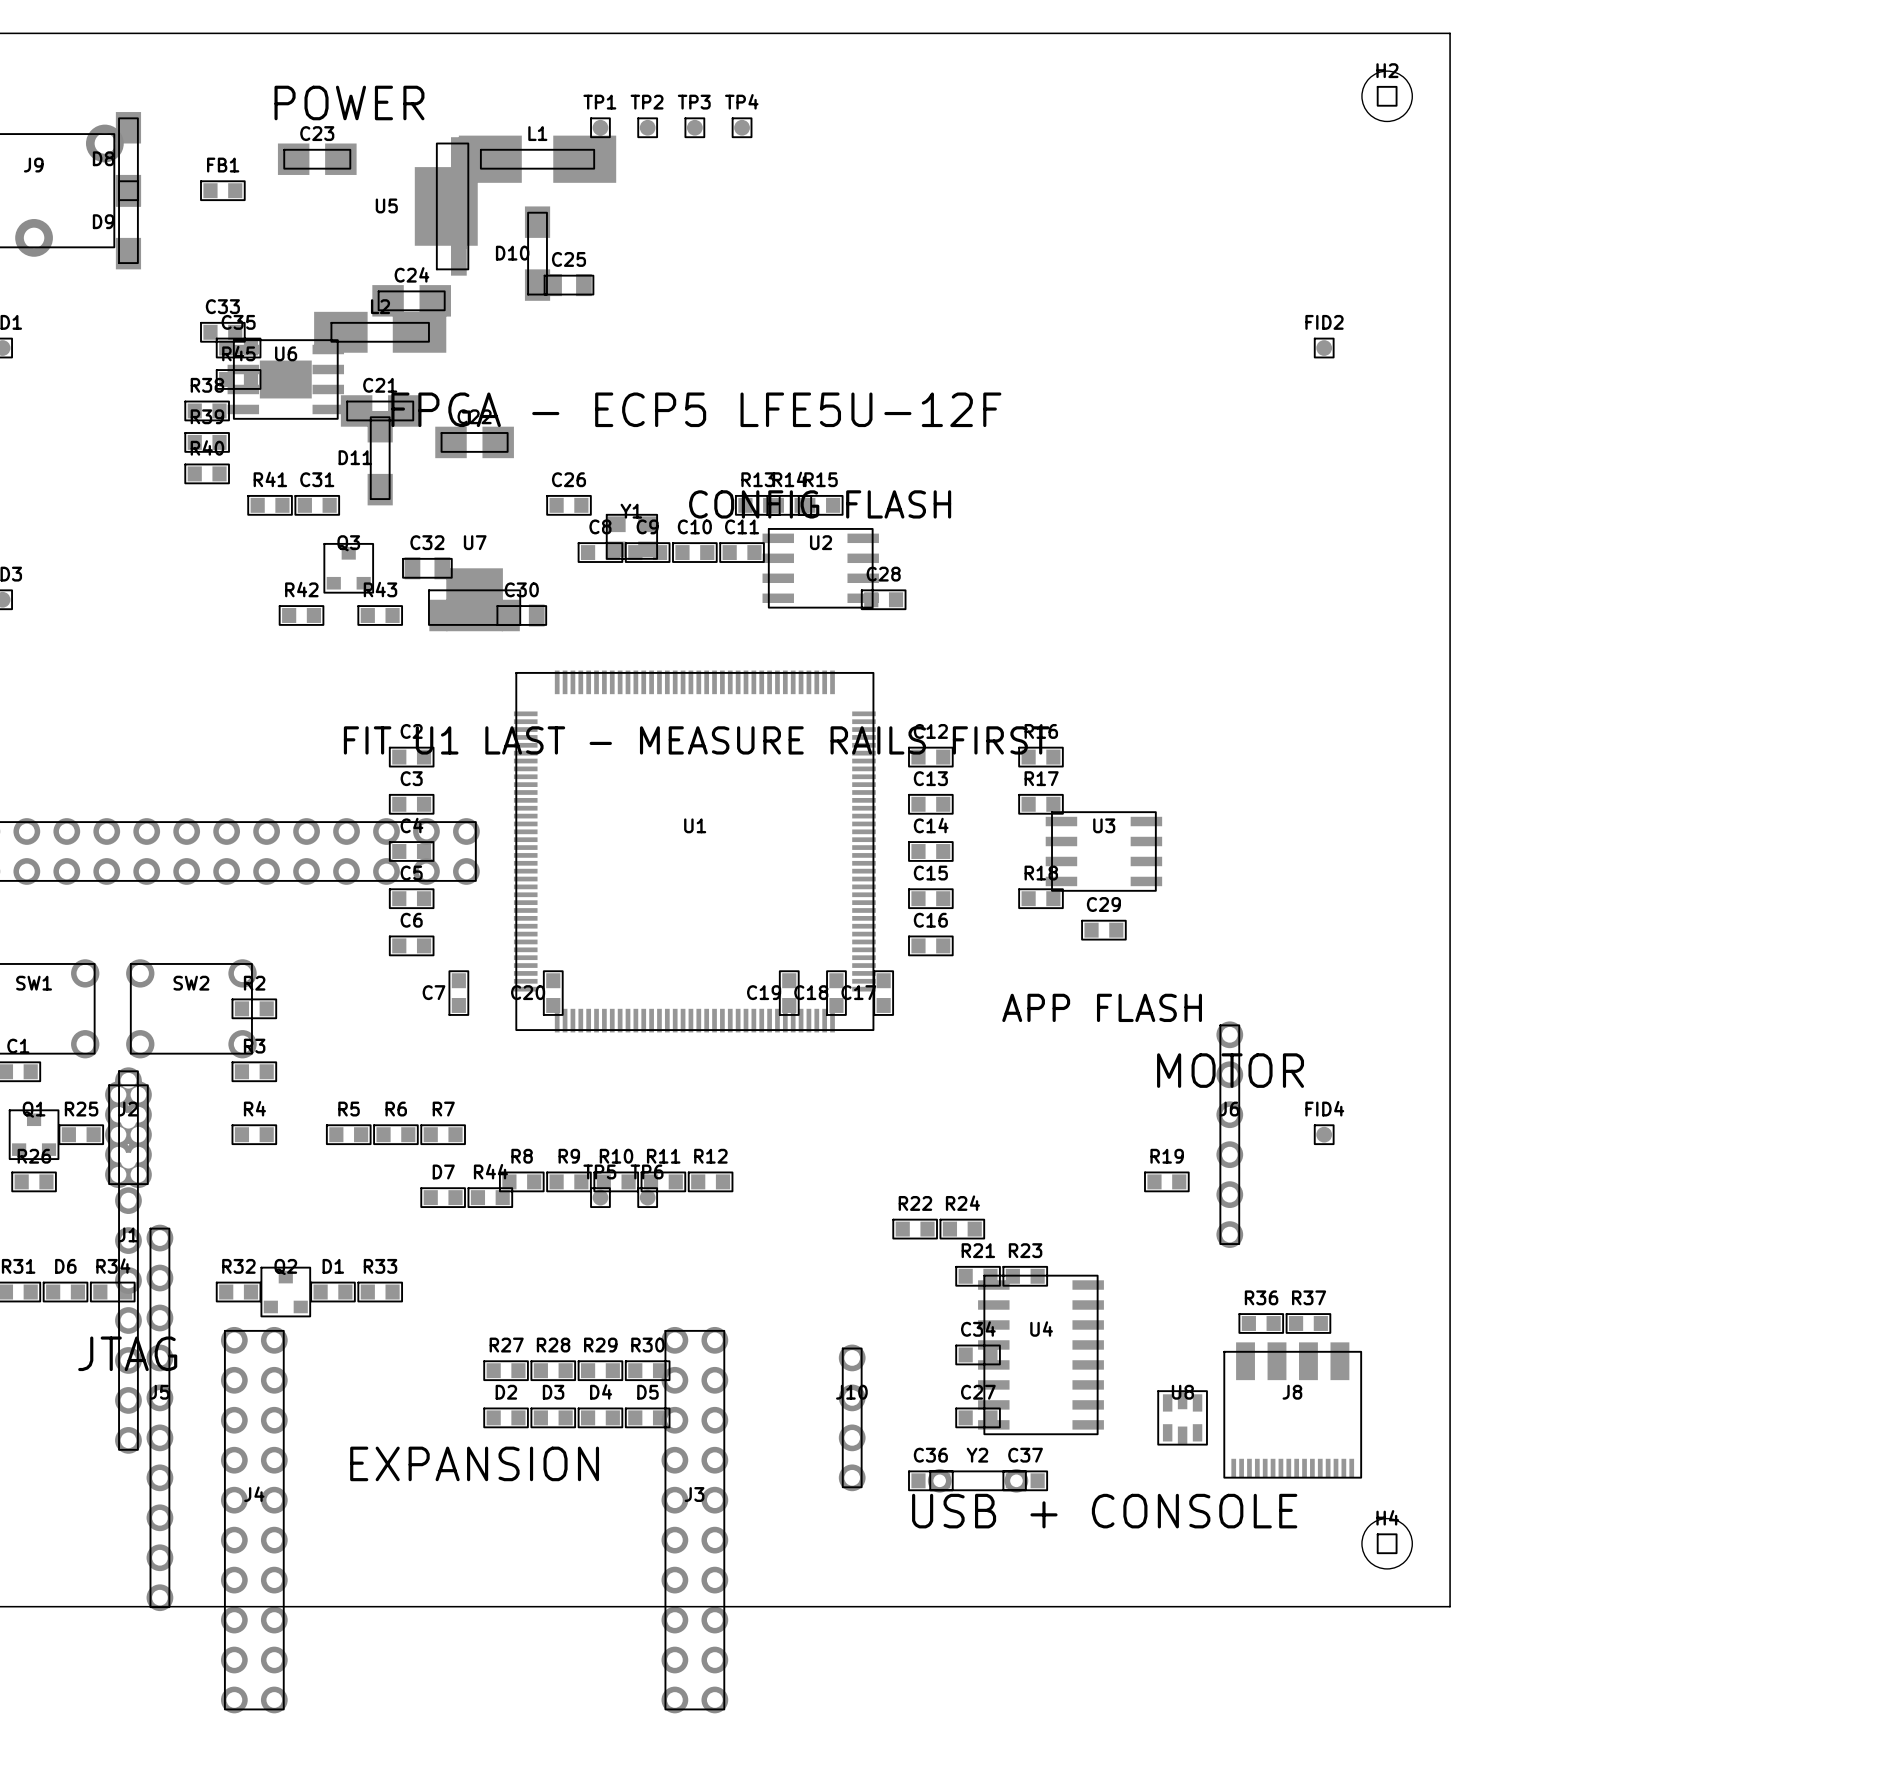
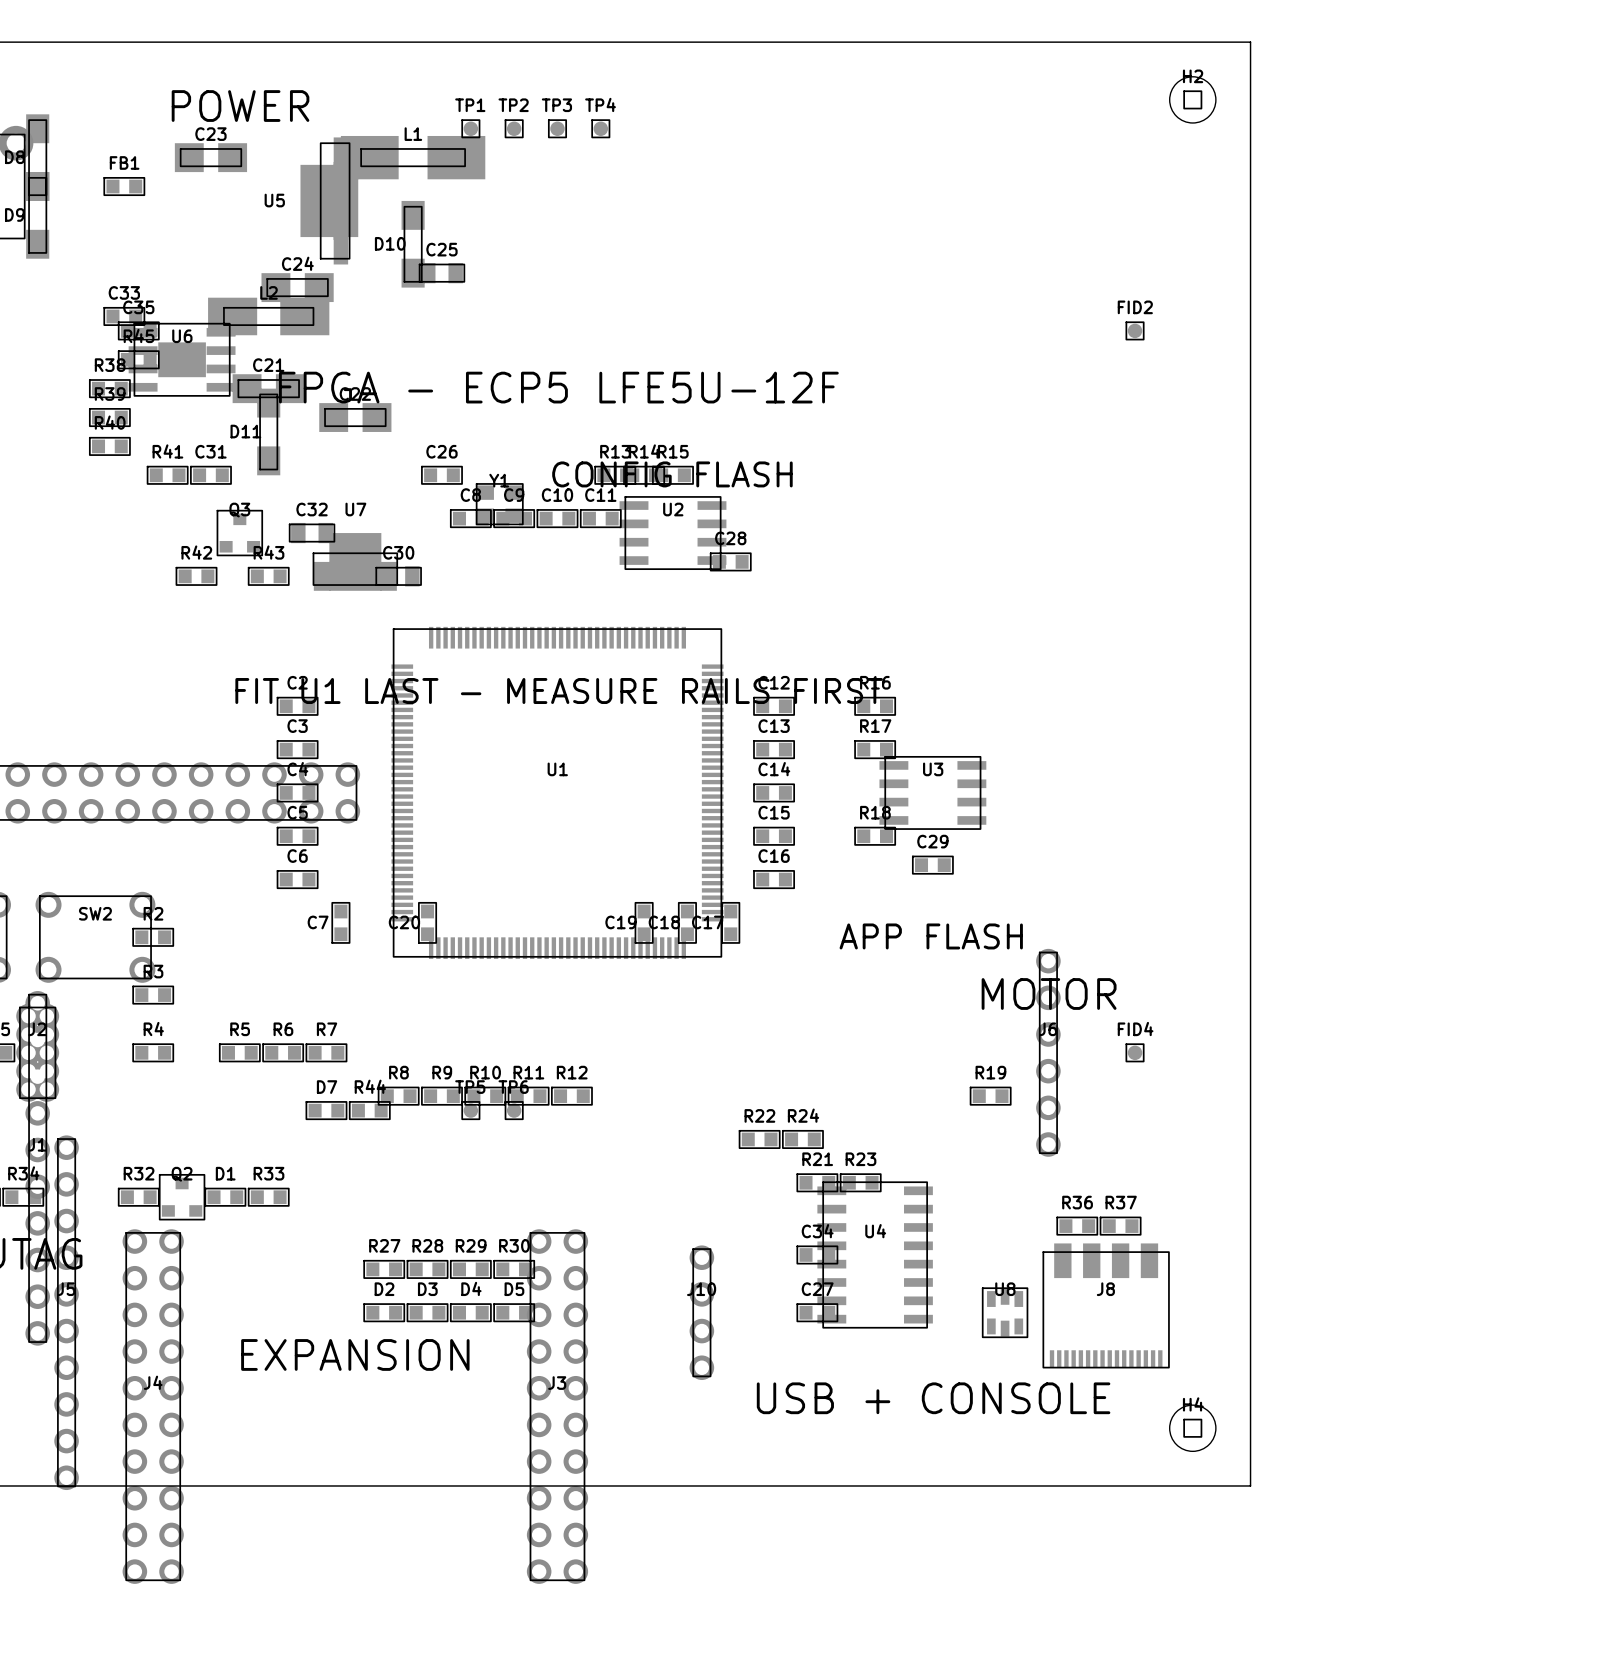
C36: (930, 1480) -> none
Y2: (978, 1480) -> none
C37: (1025, 1480) -> none

